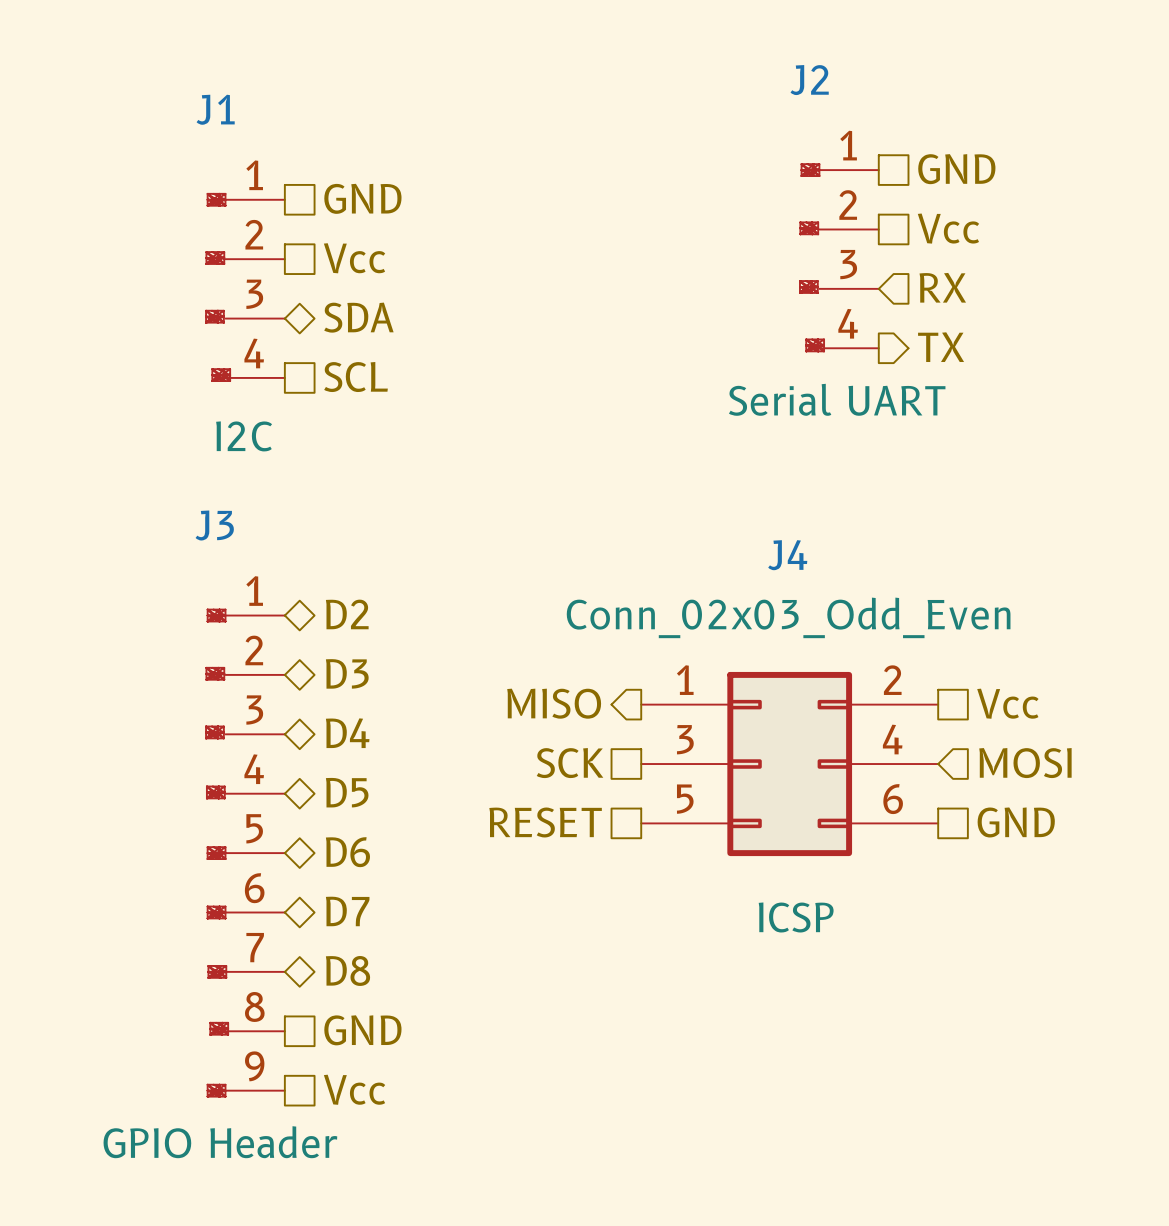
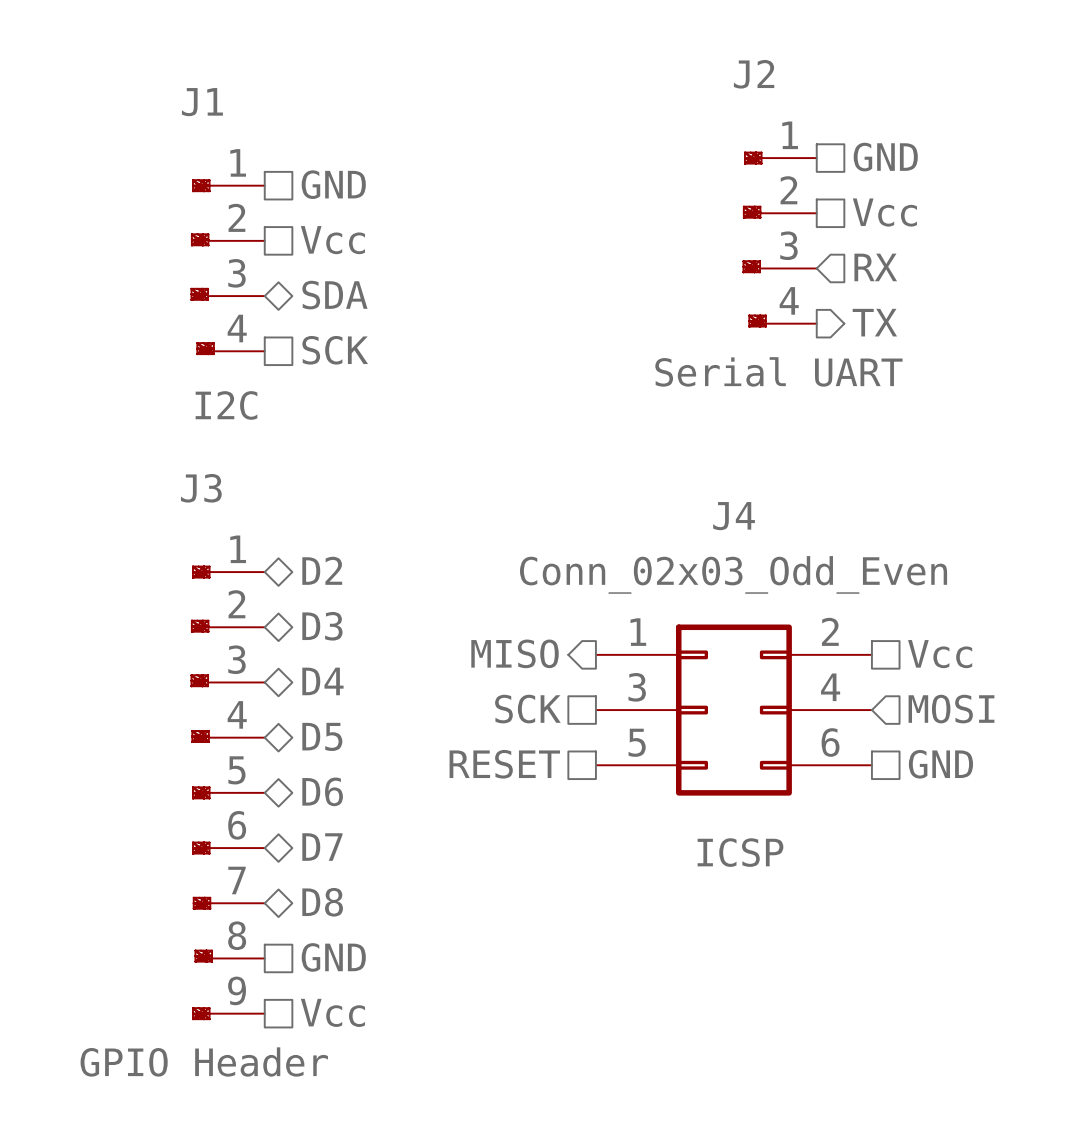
hierarchical label: SCL (356, 377) -> SCK (335, 350)

